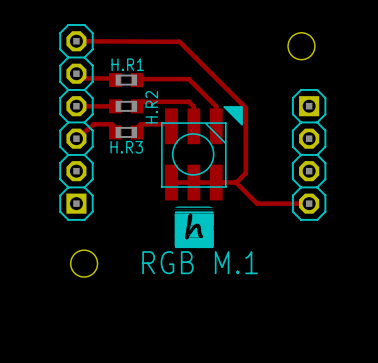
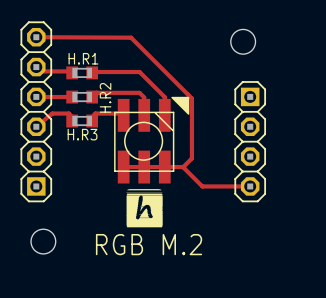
text: RGB M.1 (200, 262) -> RGB M.2 (149, 244)

